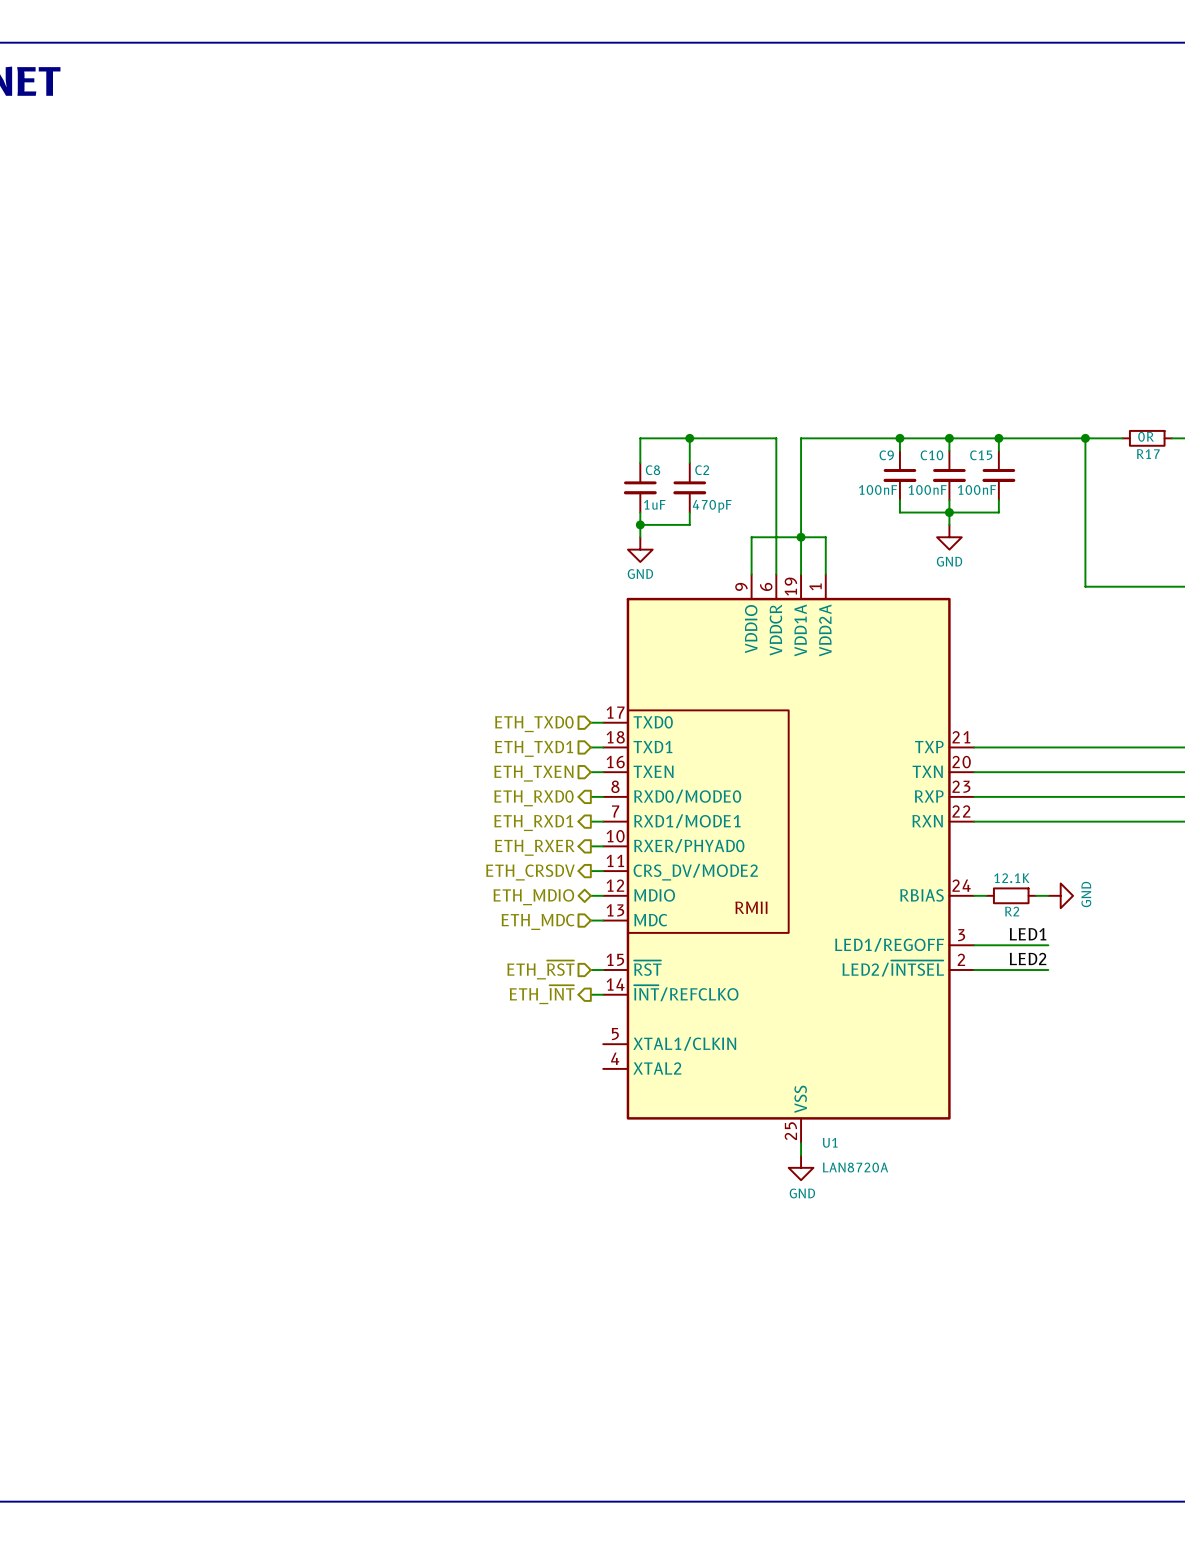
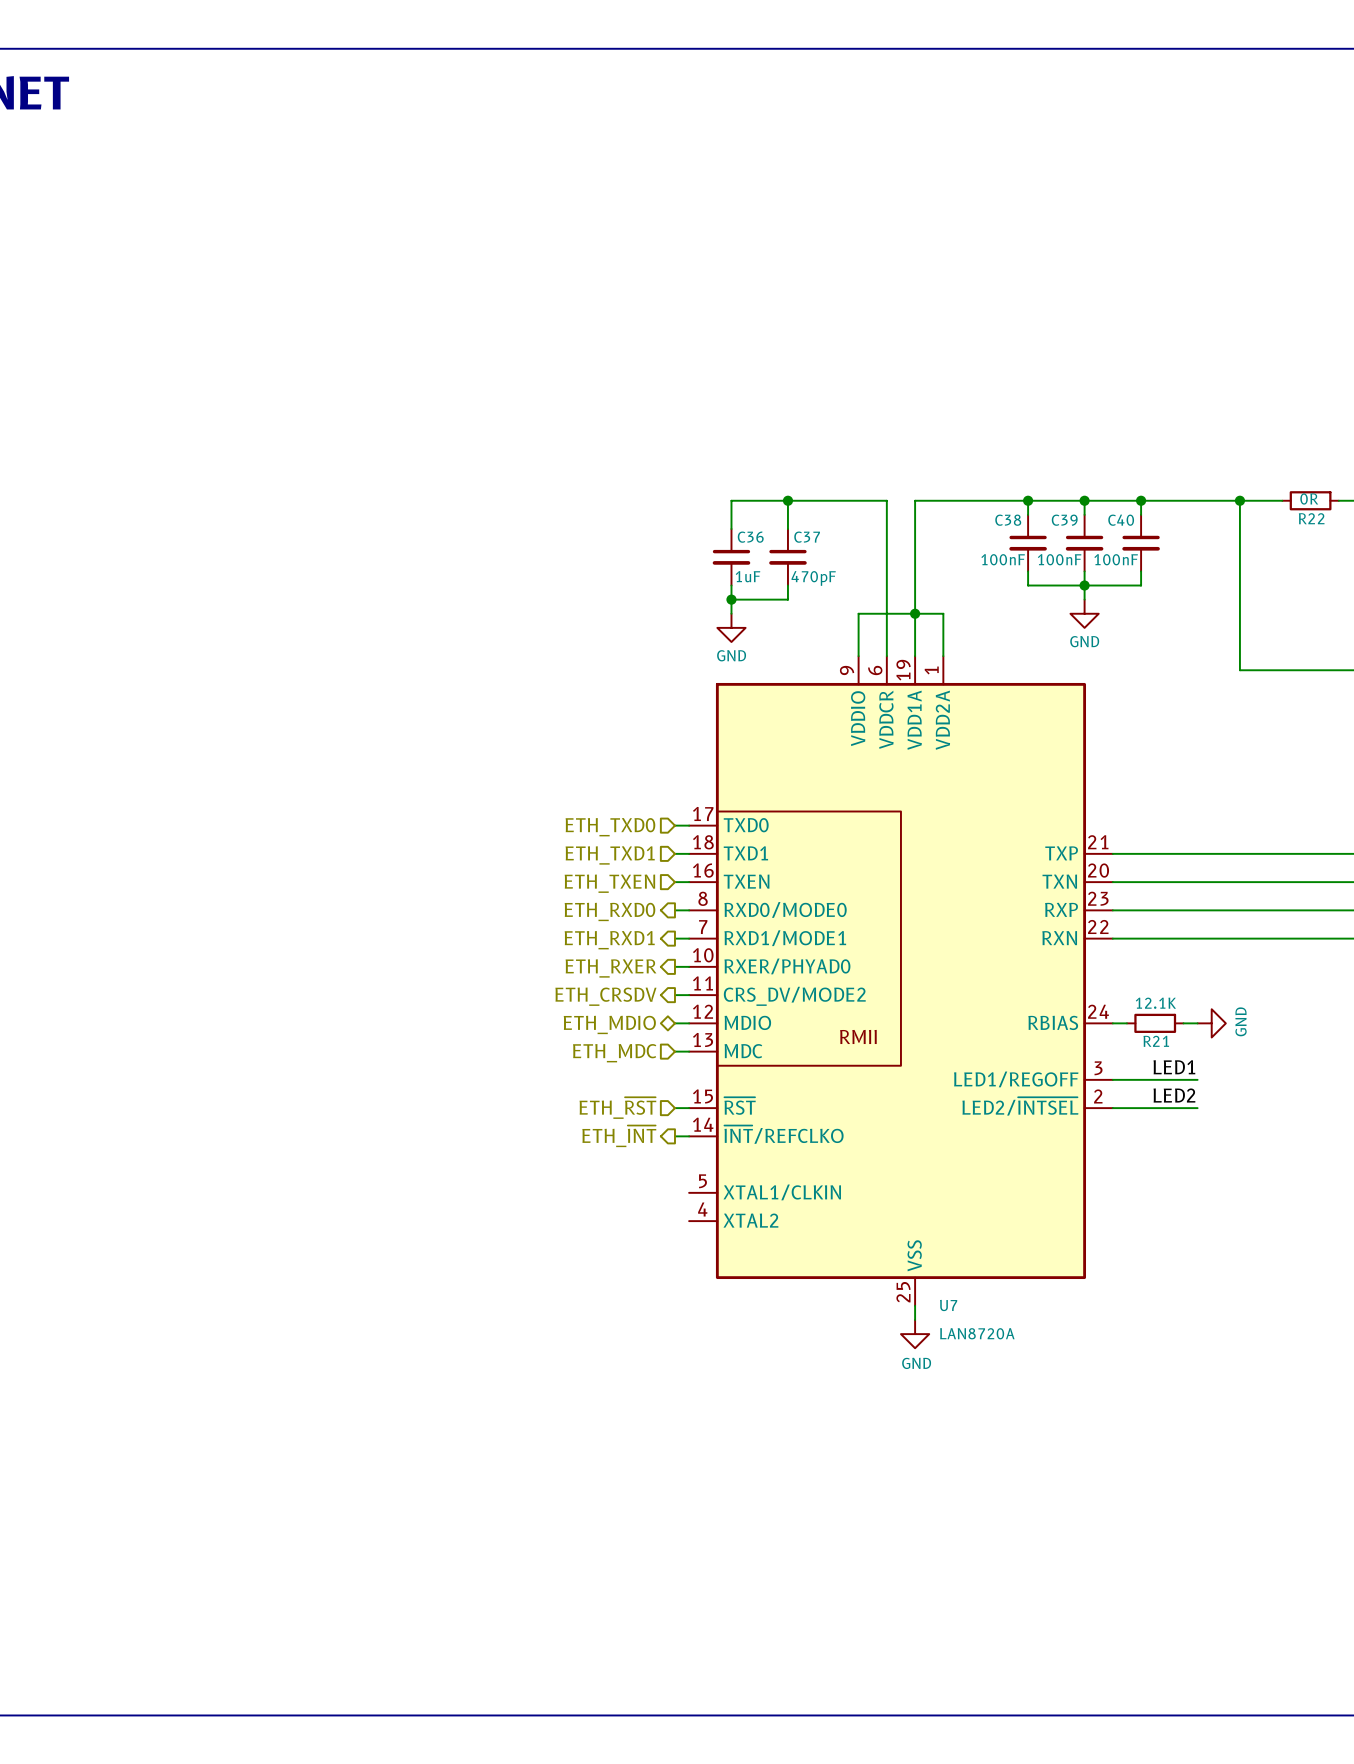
R17 name: R17 (1148, 454) -> R22 (1311, 518)
C9 name: C9 (886, 455) -> C38 (1008, 520)
C10 name: C10 (931, 455) -> C39 (1064, 520)
C15 name: C15 (981, 455) -> C40 (1121, 520)
C8 name: C8 (653, 470) -> C36 (750, 537)
C2 name: C2 (702, 470) -> C37 (807, 537)
R2 name: R2 (1012, 911) -> R21 (1156, 1041)
U1 name: U1 (830, 1142) -> U7 (948, 1305)

